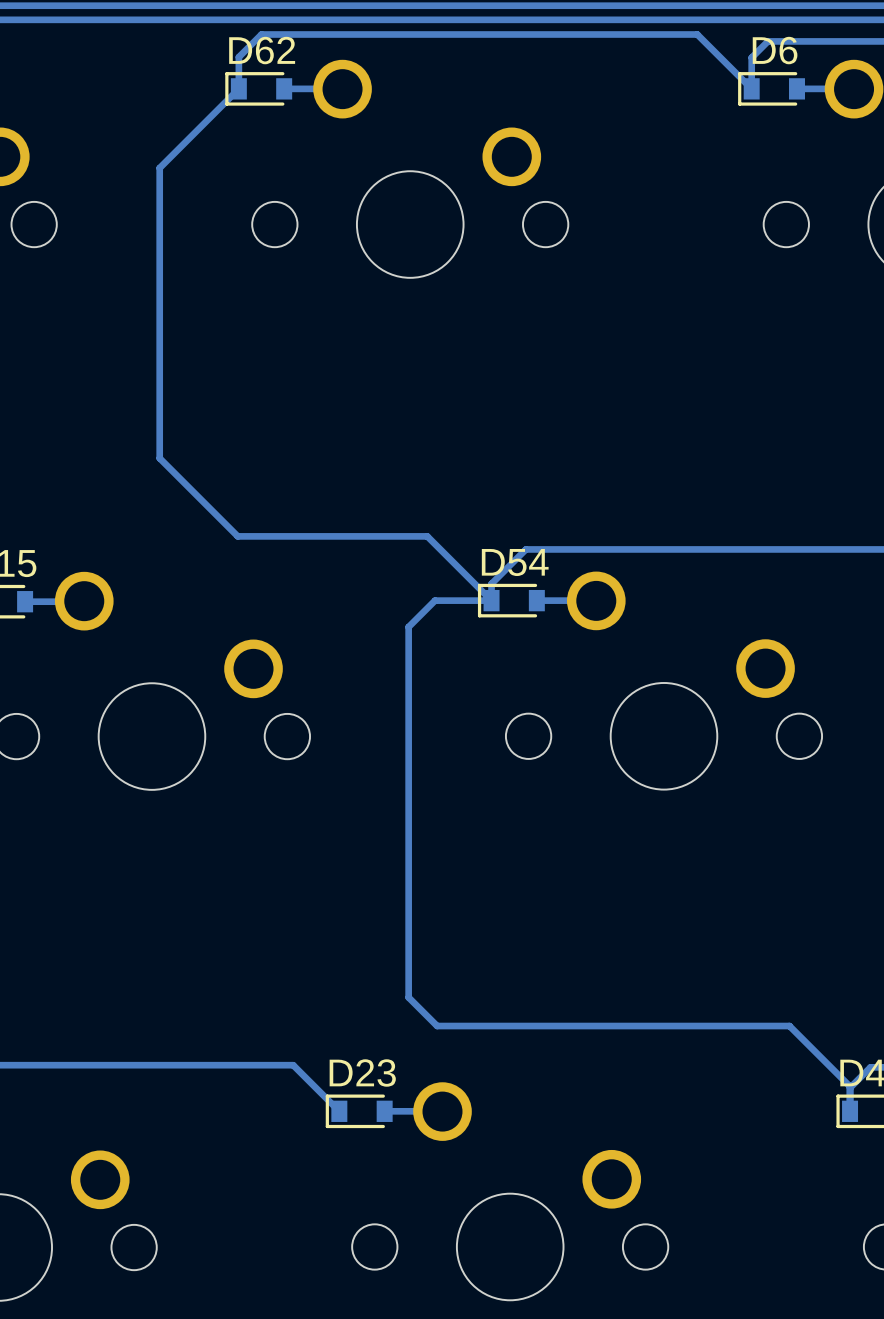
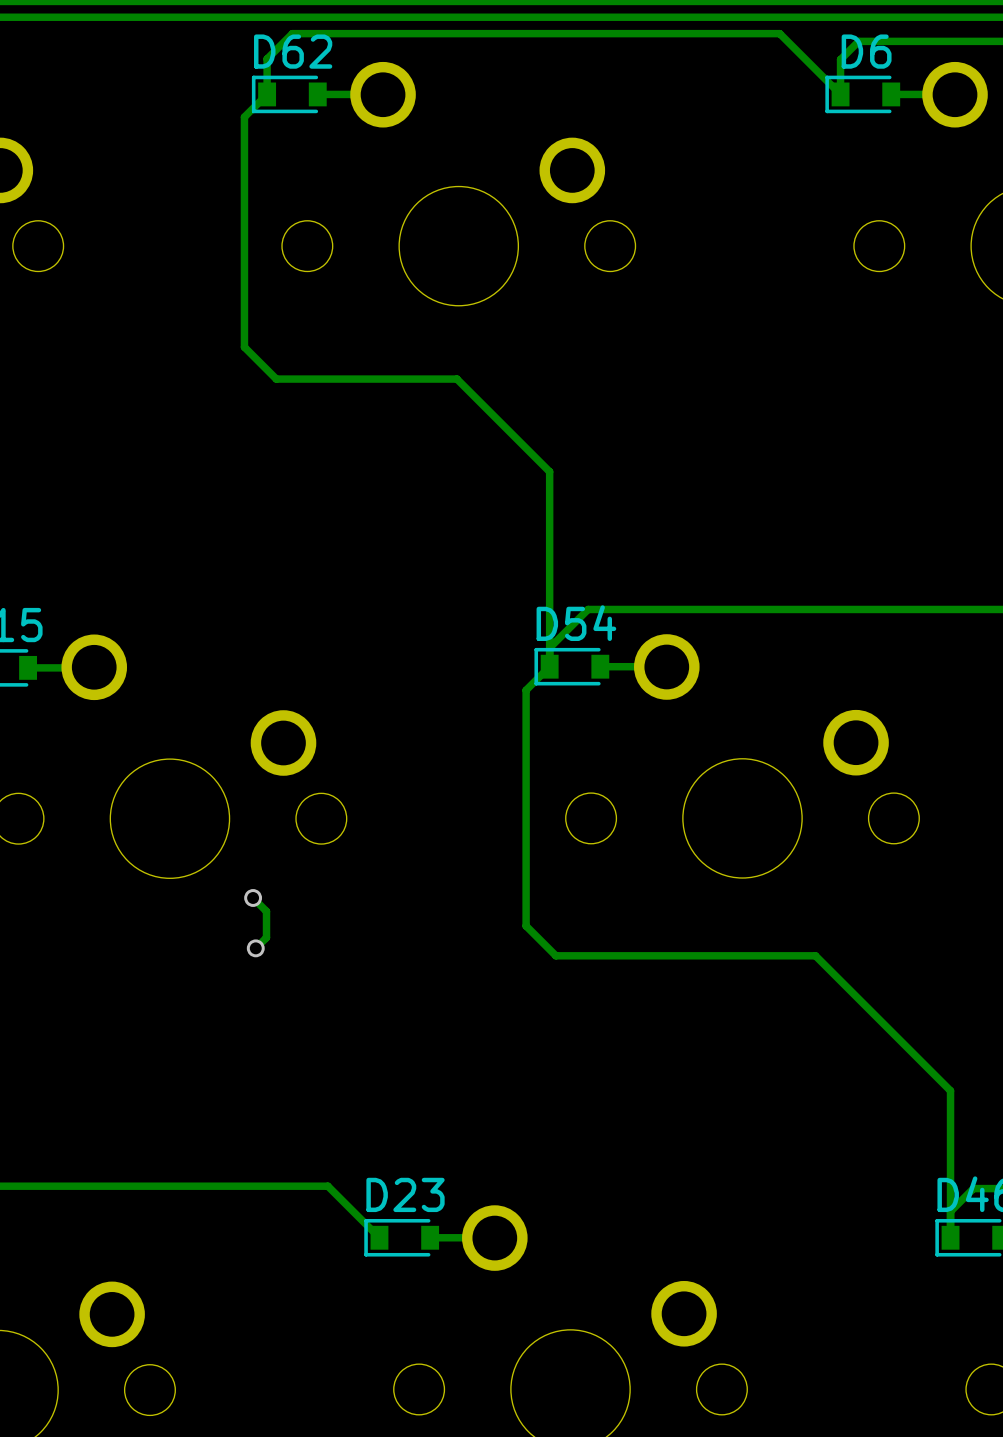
track: (218, 109) (159, 168) (159, 458) (237, 536) (427, 536) (491, 600) (435, 600) (408, 627) (408, 997) (437, 1026) (789, 1026) (850, 1086) -> (549, 666) (526, 690) (526, 926) (555, 955) (815, 955) (950, 1090) (950, 1210)
track: none -> (244, 117) (244, 347) (276, 379) (456, 379) (549, 471) (549, 647)
track: none -> (253, 897) (266, 911) (266, 937) (255, 948)
via: none -> (253, 897)
via: none -> (255, 948)

